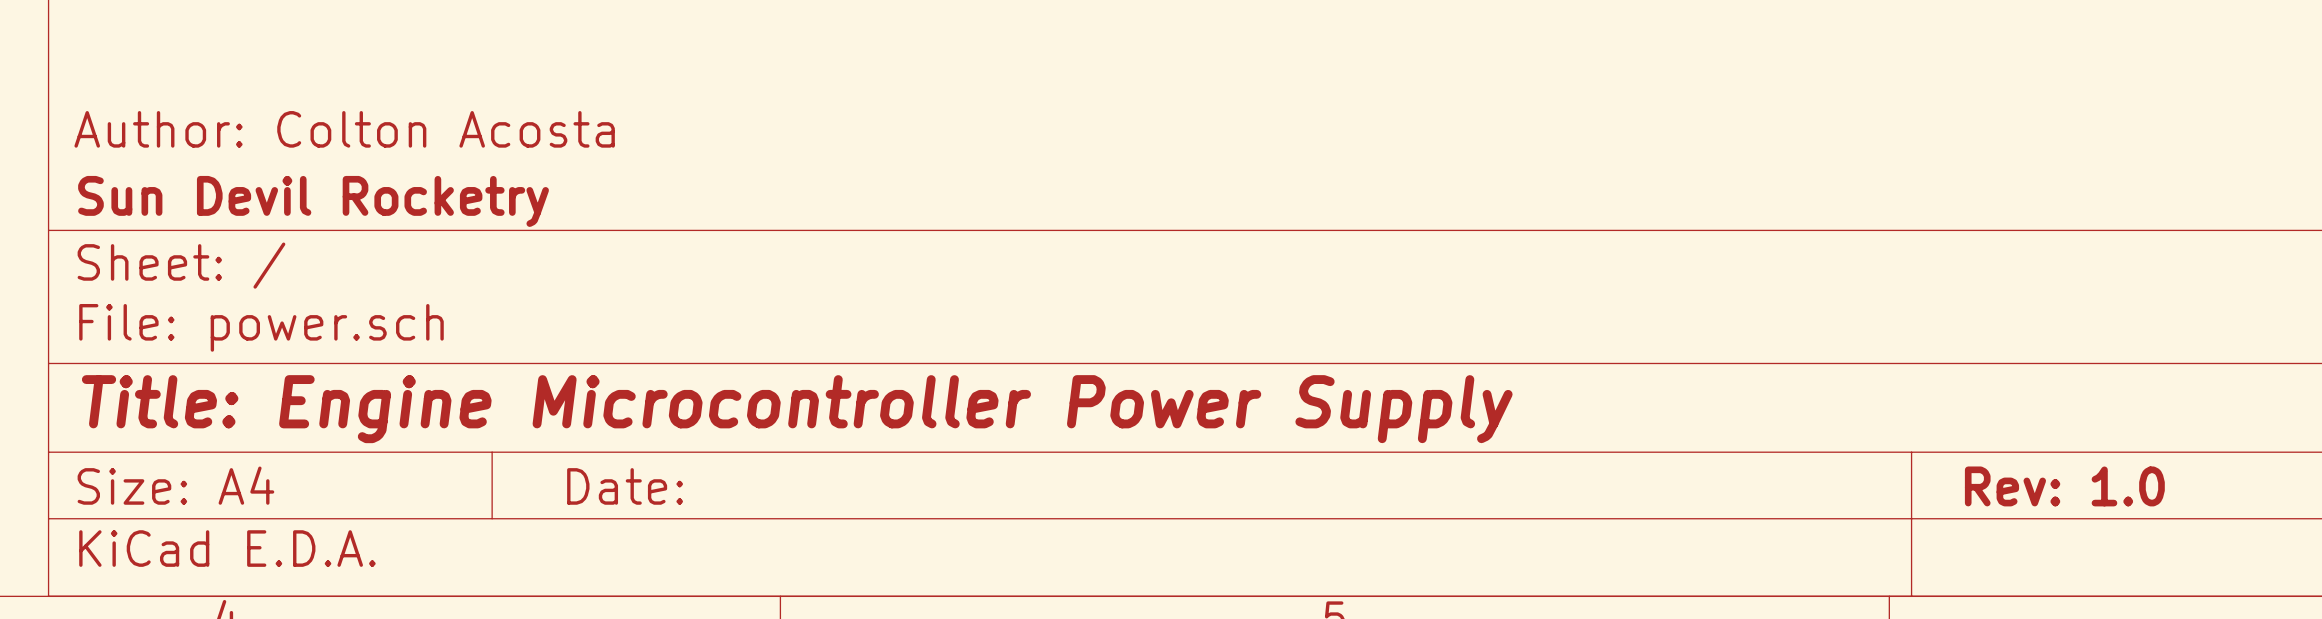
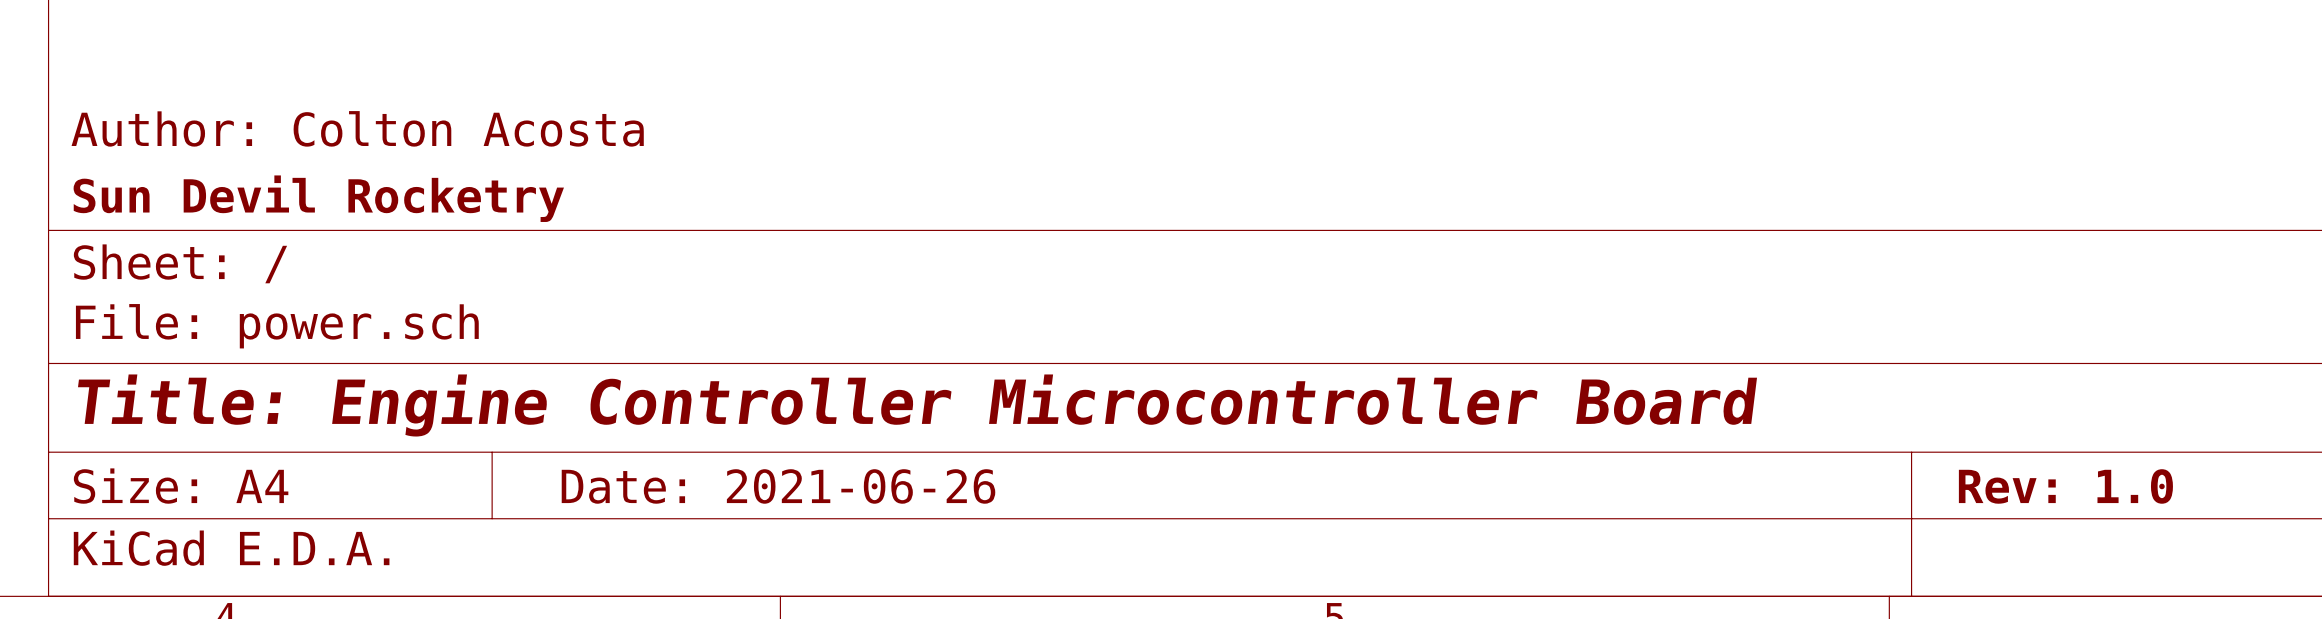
title block: Title: Engine Microcontroller Power Supply (797, 409) -> Title: Engine Controller Microcontroller Board (917, 405)
title block: Date: (625, 486) -> Date: 2021-06-26 (778, 486)

